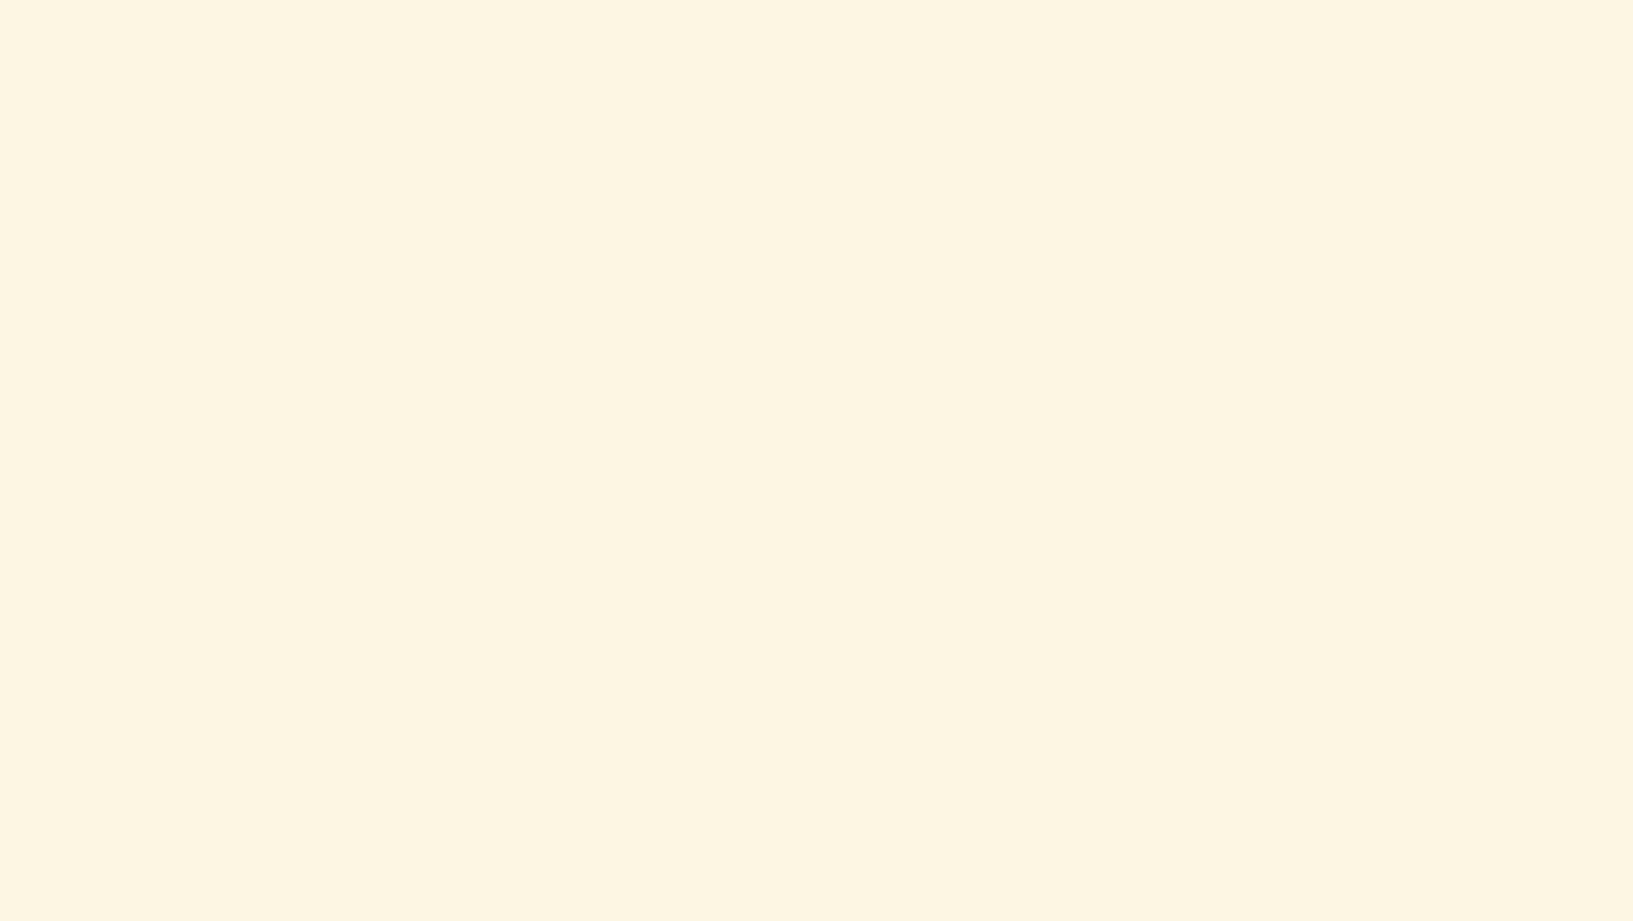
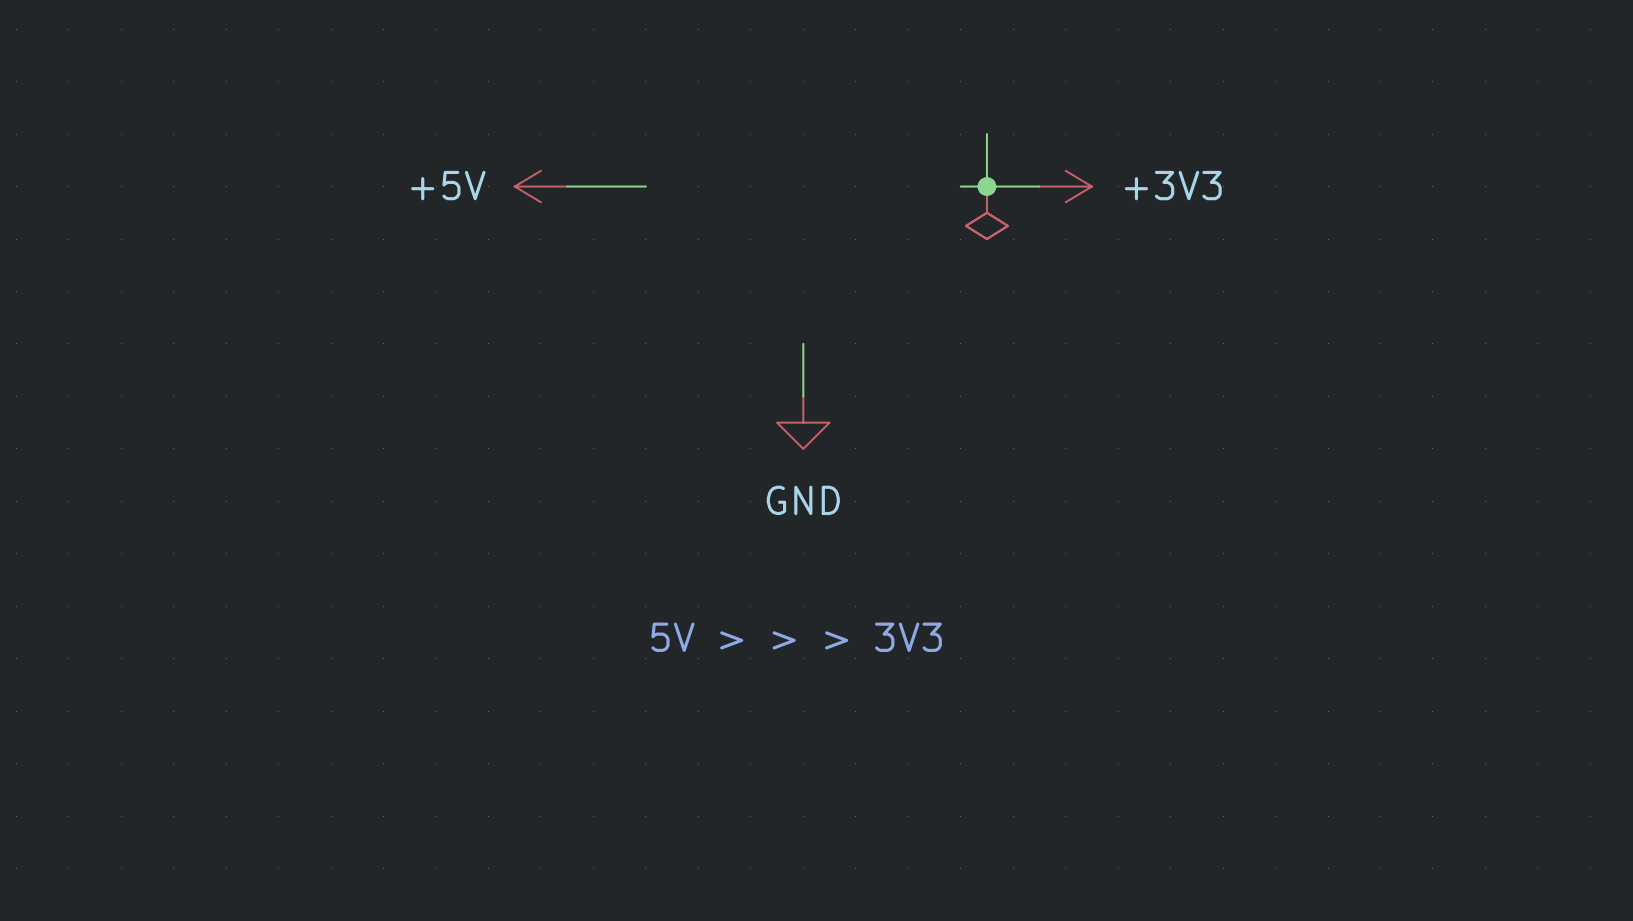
wire: none -> (986, 134) (986, 186)
power symbol: none -> +5V (540, 186)
wire: none -> (567, 186) (645, 186)
wire: none -> (960, 186) (1039, 186)
junction: none -> (986, 186)
power symbol: none -> +3V3 (1065, 186)
power symbol: none -> (986, 212)
wire: none -> (803, 343) (803, 396)
power symbol: none -> GND (803, 422)
text: none -> 5V > > > 3V3 (796, 637)

